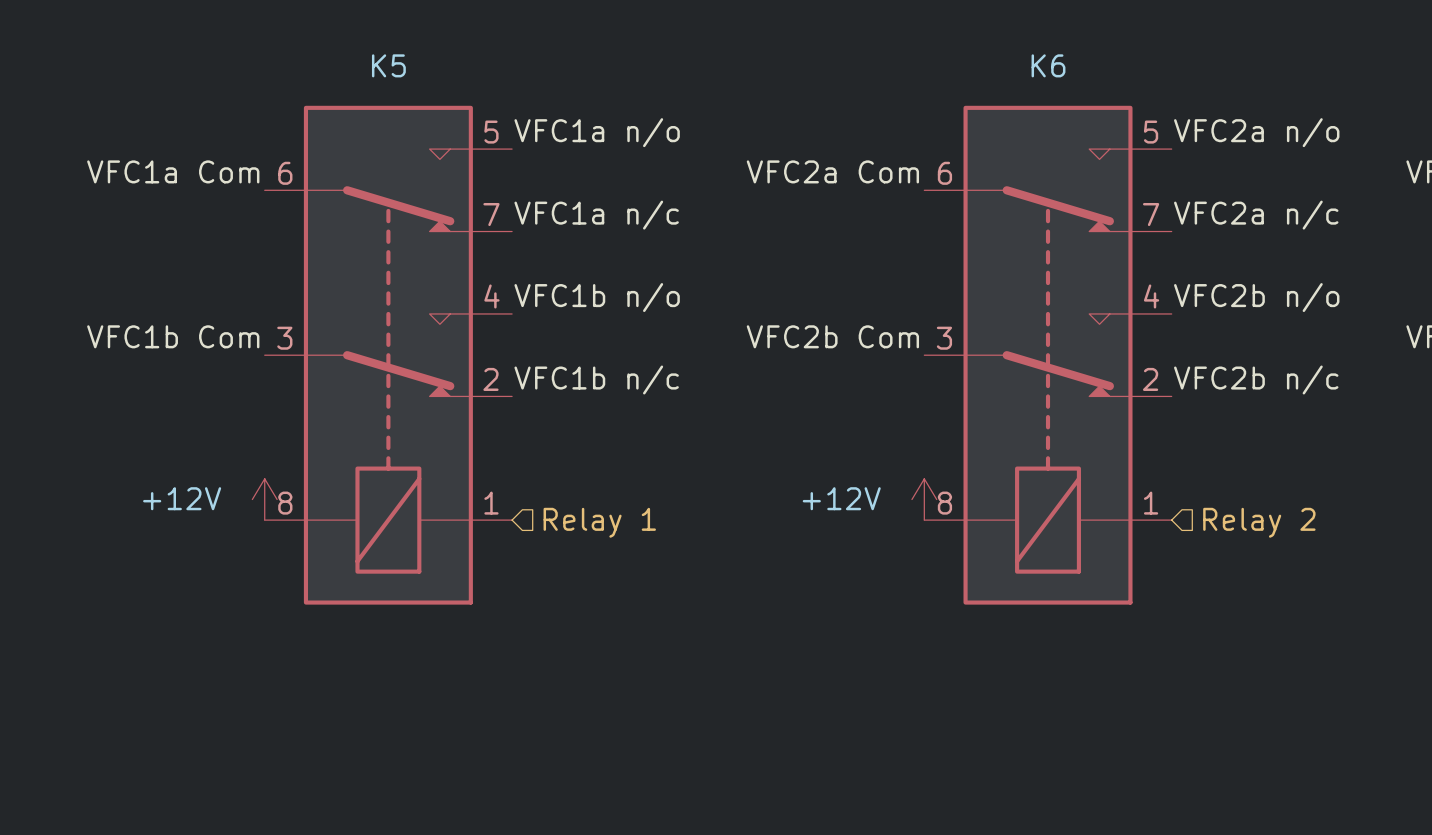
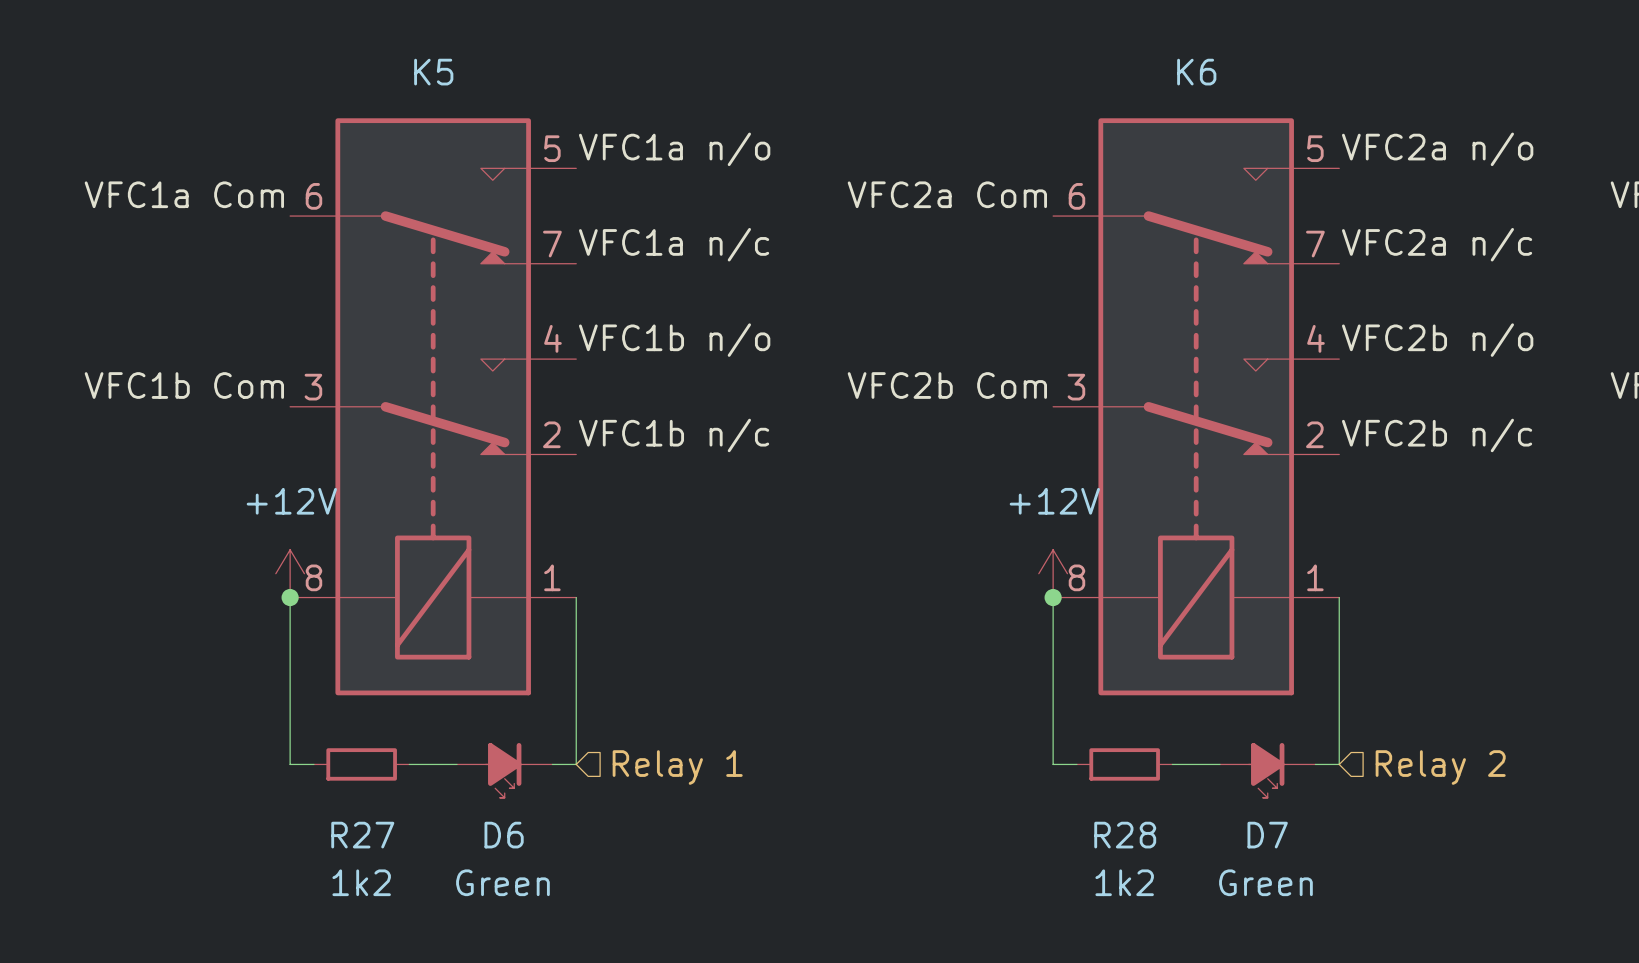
power symbol text position: +12V (182, 498) -> +12V (291, 501)
power symbol text position: +12V (841, 498) -> +12V (1054, 501)
wire: none -> (290, 597) (290, 764) (313, 764)
junction: none -> (290, 597)
wire: none -> (576, 597) (576, 764) (552, 764)
wire: none -> (1053, 597) (1053, 764) (1076, 764)
junction: none -> (1053, 597)
wire: none -> (1339, 597) (1339, 764) (1315, 764)
hierarchical label position: Relay 1 (599, 522) -> Relay 1 (677, 767)
hierarchical label position: Relay 2 (1259, 522) -> Relay 2 (1440, 767)
R27: none -> 1k2 (361, 764)
wire: none -> (409, 764) (457, 764)
R28: none -> 1k2 (1124, 764)
wire: none -> (1172, 764) (1220, 764)
D6: none -> Green (504, 770)
D7: none -> Green (1267, 770)

